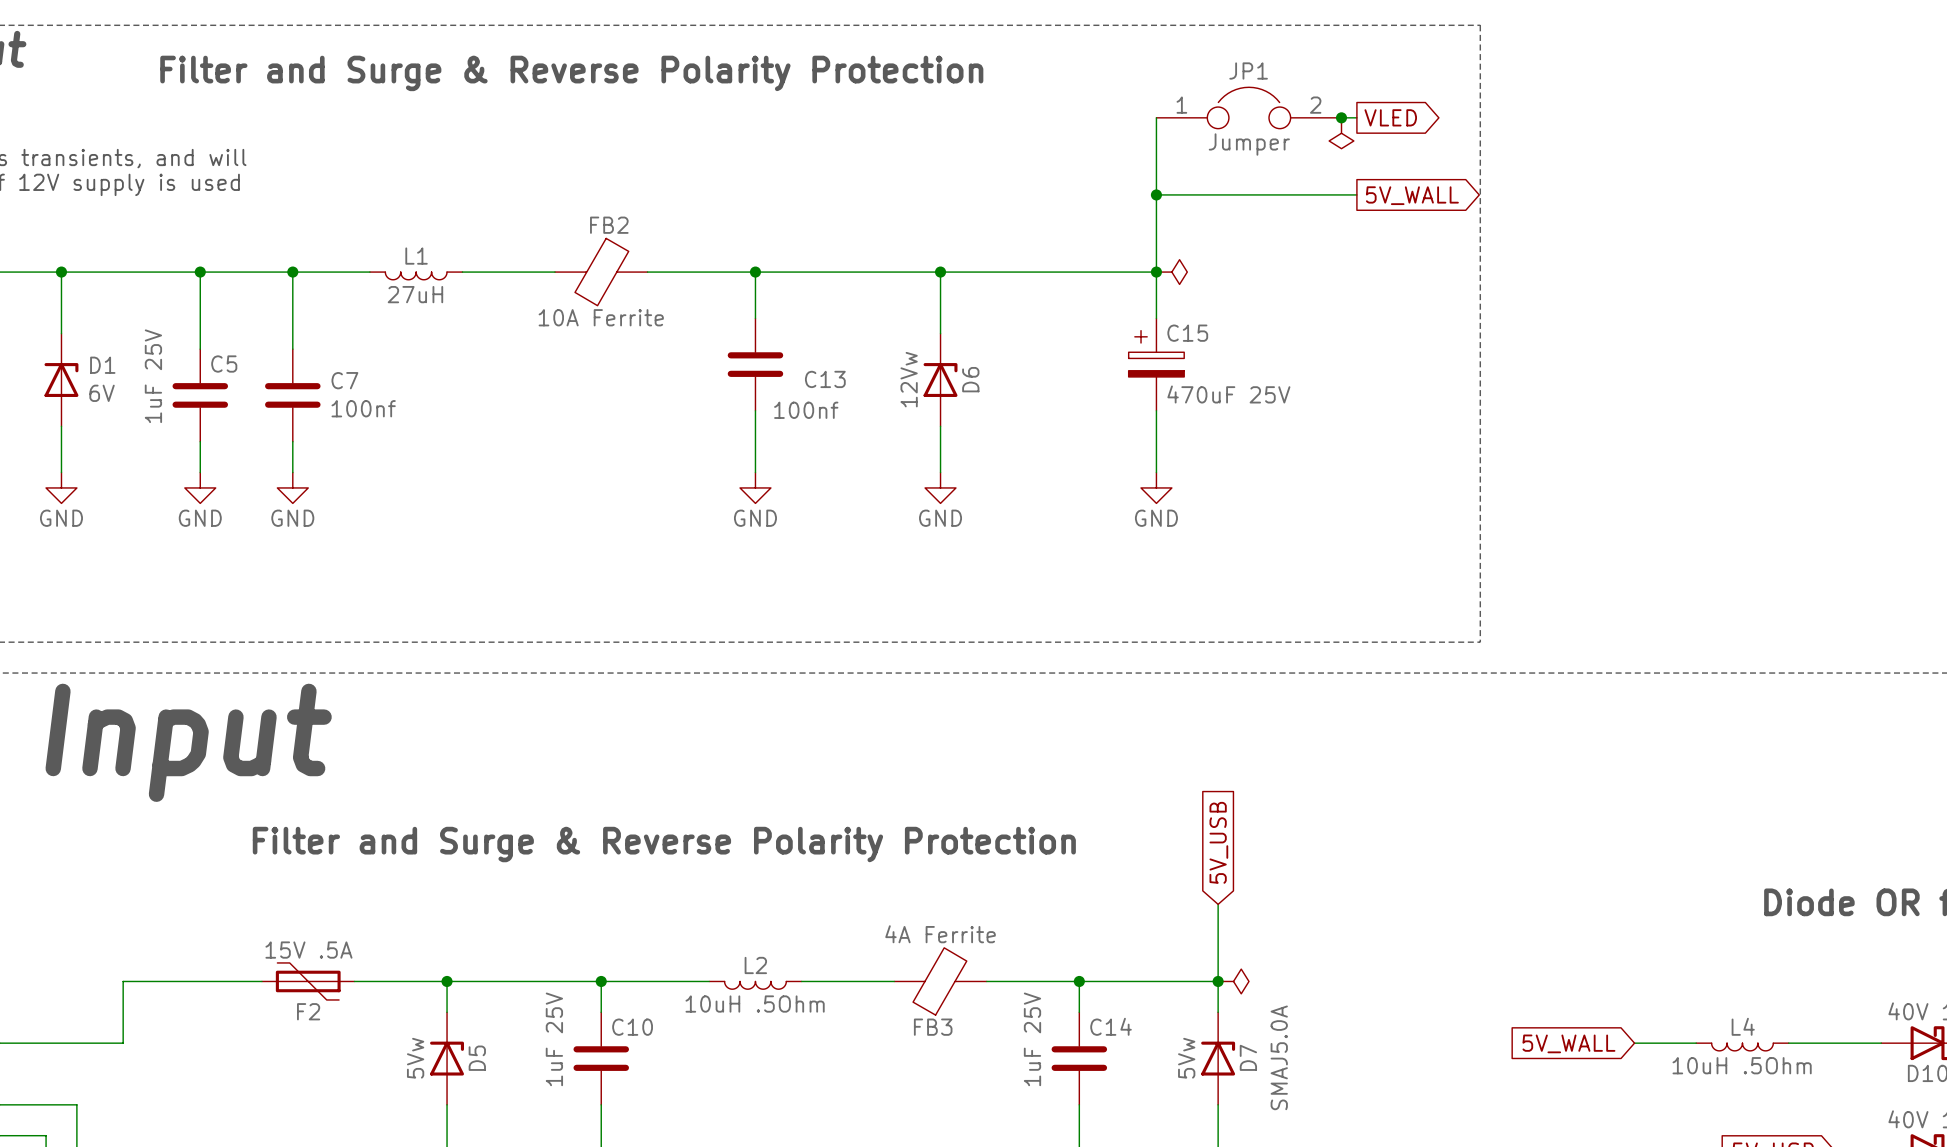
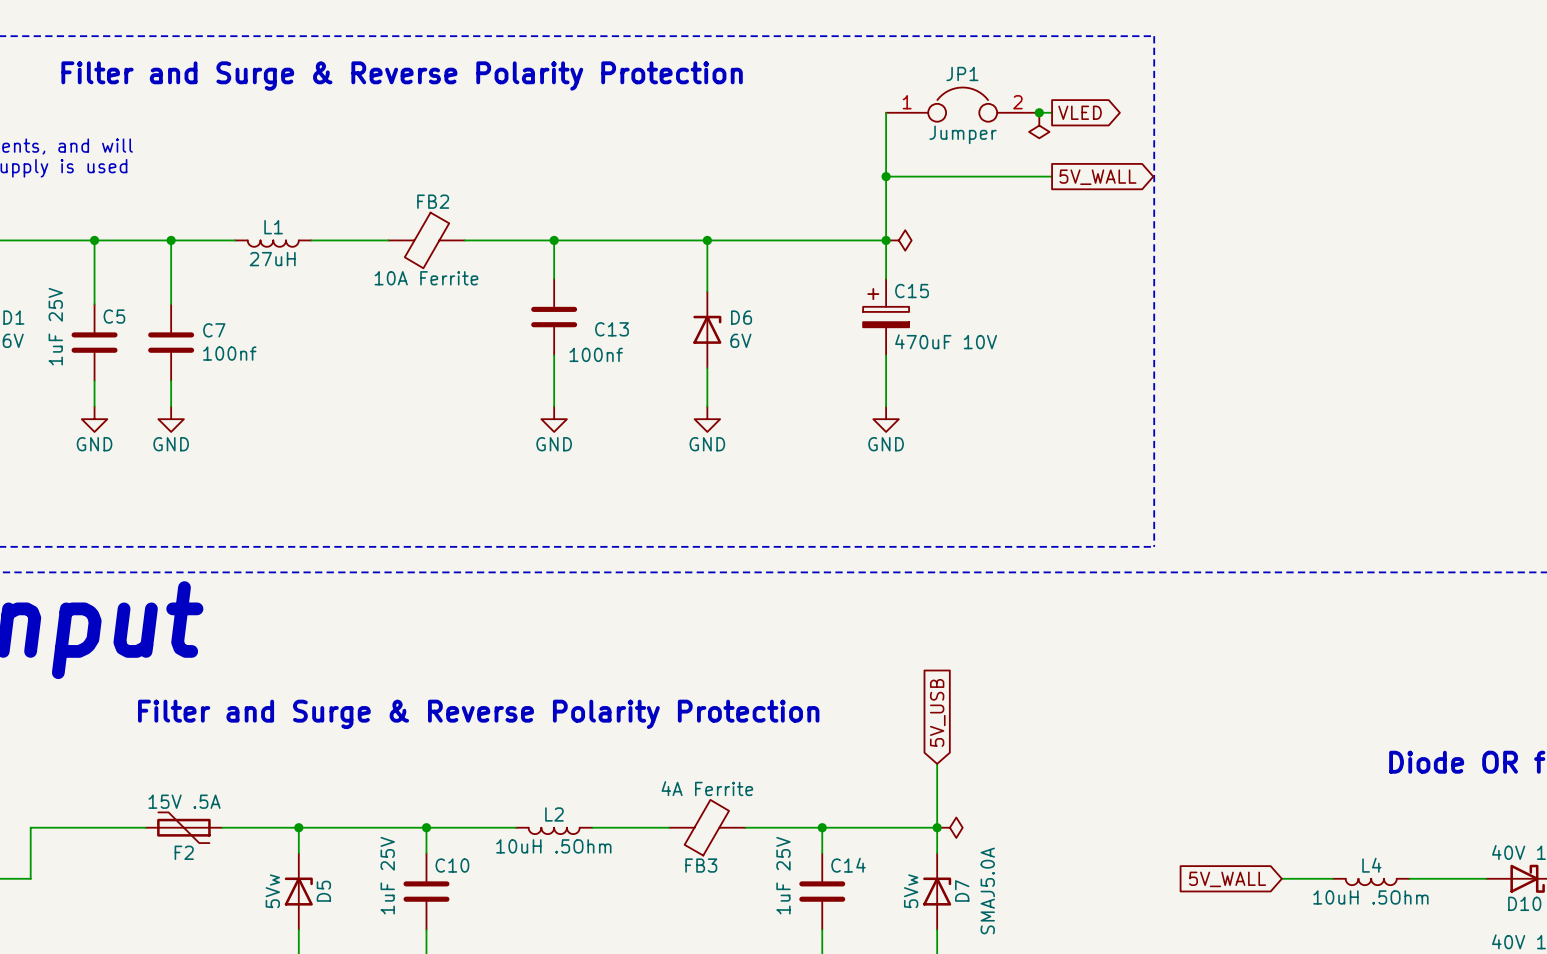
D6 value: 12Vw (909, 379) -> 6V (740, 340)
D6 name rotation: 0° (970, 379) -> 90° clockwise (741, 317)
C15 value: 470uF 25V (1228, 394) -> 470uF 10V (946, 341)

